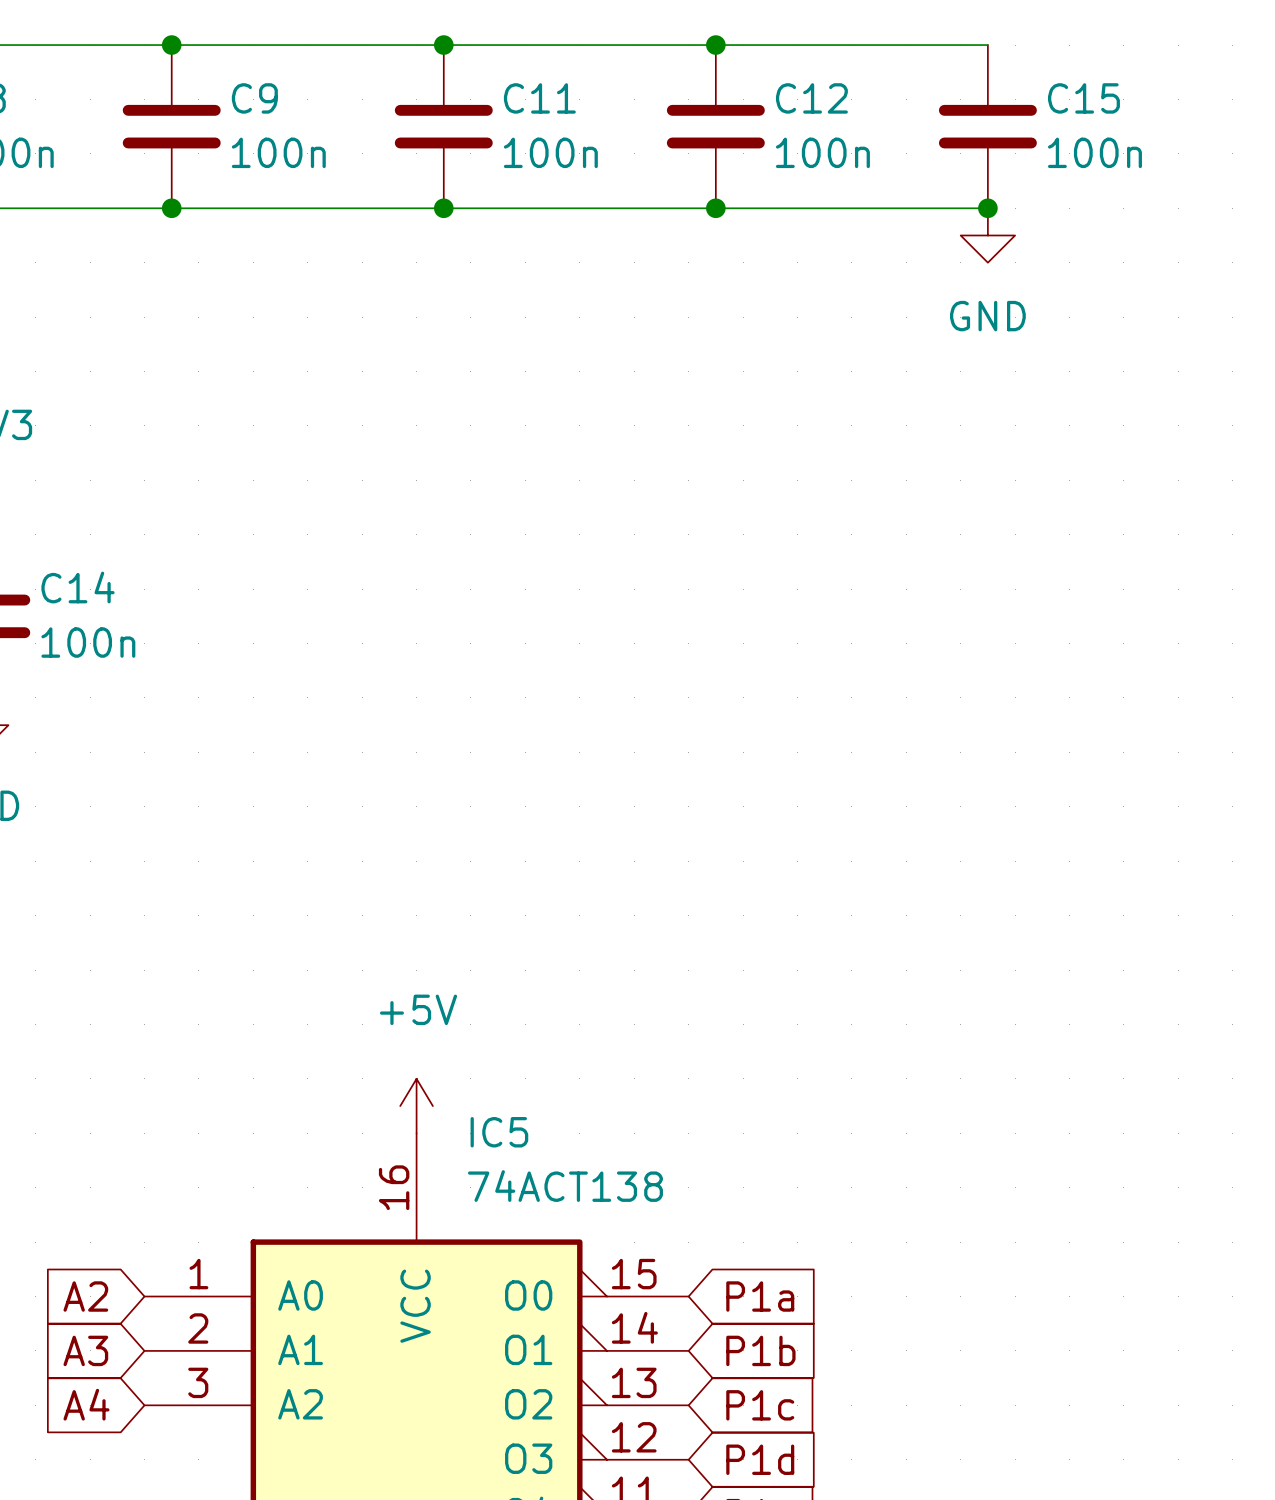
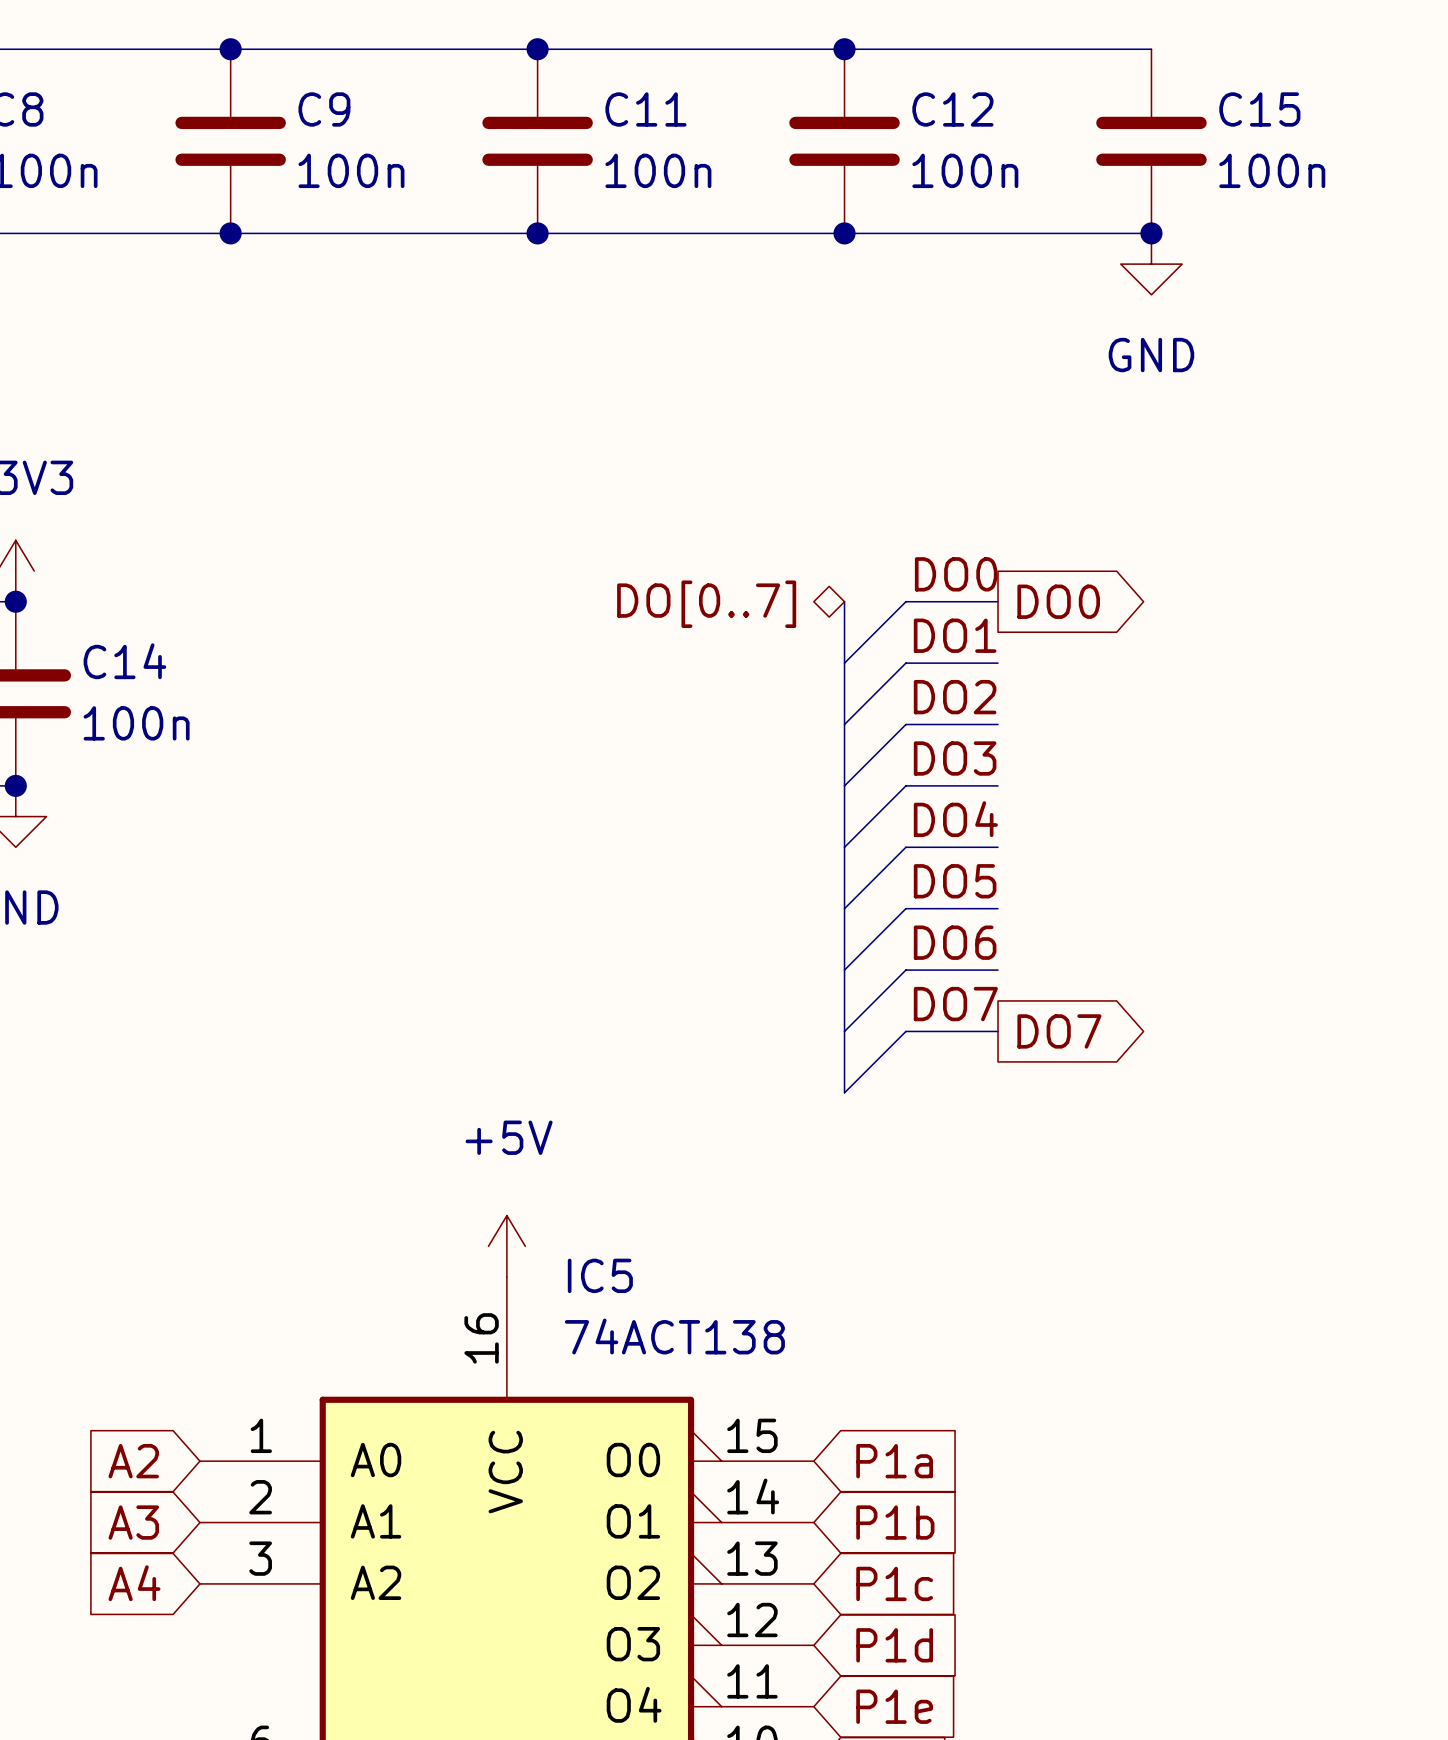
label: none -> DO0 (956, 574)
bus: none -> (844, 601) (844, 1092)
wire: none -> (997, 601) (905, 601) (844, 663)
global label: none -> DO0 (1058, 601)
hierarchical label: none -> DO[0..7] (706, 604)
label: none -> DO1 (955, 635)
wire: none -> (997, 663) (905, 663) (844, 724)
label: none -> DO2 (955, 697)
wire: none -> (997, 724) (905, 724) (844, 785)
label: none -> DO3 (955, 758)
wire: none -> (997, 785) (905, 785) (844, 847)
label: none -> DO4 (955, 819)
wire: none -> (997, 847) (905, 847) (844, 908)
label: none -> DO5 (955, 881)
wire: none -> (997, 908) (905, 908) (844, 970)
label: none -> DO6 (955, 942)
wire: none -> (997, 970) (905, 970) (844, 1031)
label: none -> DO7 (955, 1004)
wire: none -> (997, 1031) (905, 1031) (844, 1092)
global label: none -> DO7 (1059, 1031)

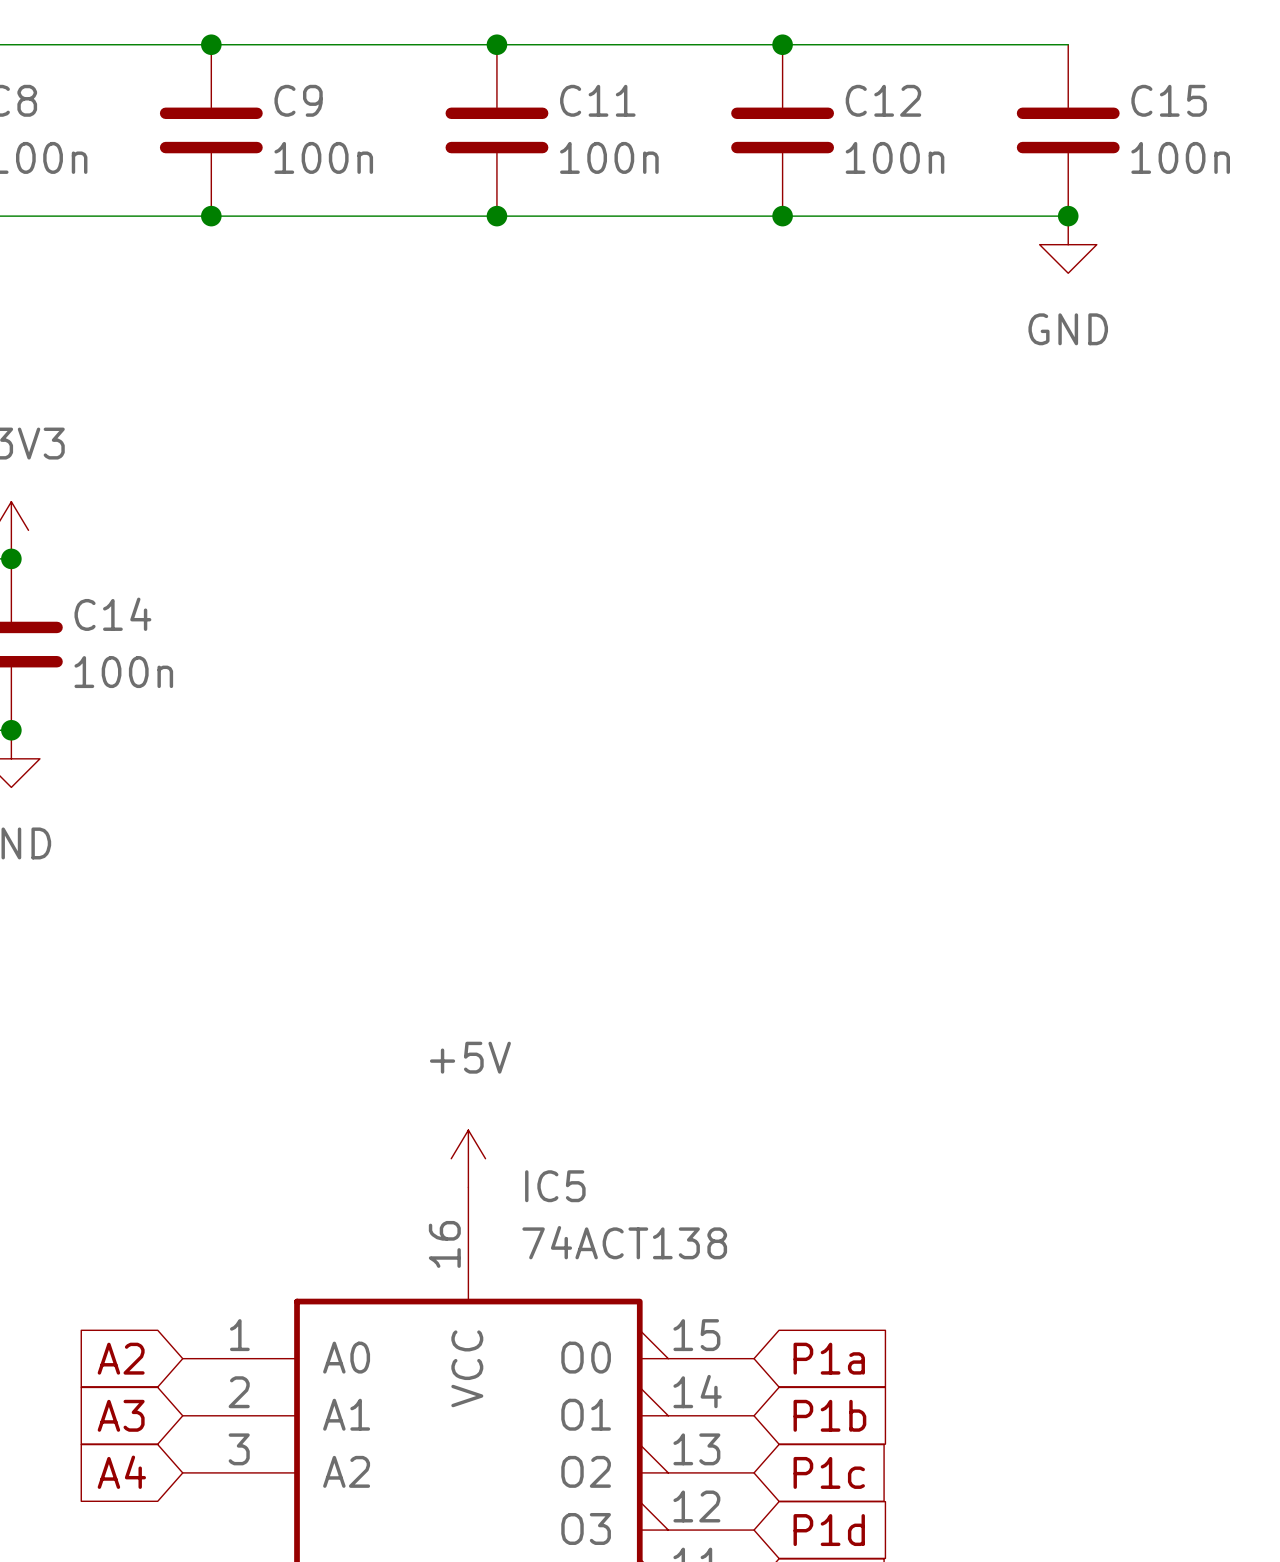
label: DO0 (956, 574) -> none
bus: (844, 601) (844, 1092) -> none
wire: (997, 601) (905, 601) (844, 663) -> none
global label: DO0 (1058, 601) -> none
hierarchical label: DO[0..7] (706, 604) -> none
label: DO1 (955, 635) -> none
wire: (997, 663) (905, 663) (844, 724) -> none
label: DO2 (955, 697) -> none
wire: (997, 724) (905, 724) (844, 785) -> none
label: DO3 (955, 758) -> none
wire: (997, 785) (905, 785) (844, 847) -> none
label: DO4 (955, 819) -> none
wire: (997, 847) (905, 847) (844, 908) -> none
label: DO5 (955, 881) -> none
wire: (997, 908) (905, 908) (844, 970) -> none
label: DO6 (955, 942) -> none
wire: (997, 970) (905, 970) (844, 1031) -> none
label: DO7 (955, 1004) -> none
wire: (997, 1031) (905, 1031) (844, 1092) -> none
global label: DO7 (1059, 1031) -> none

